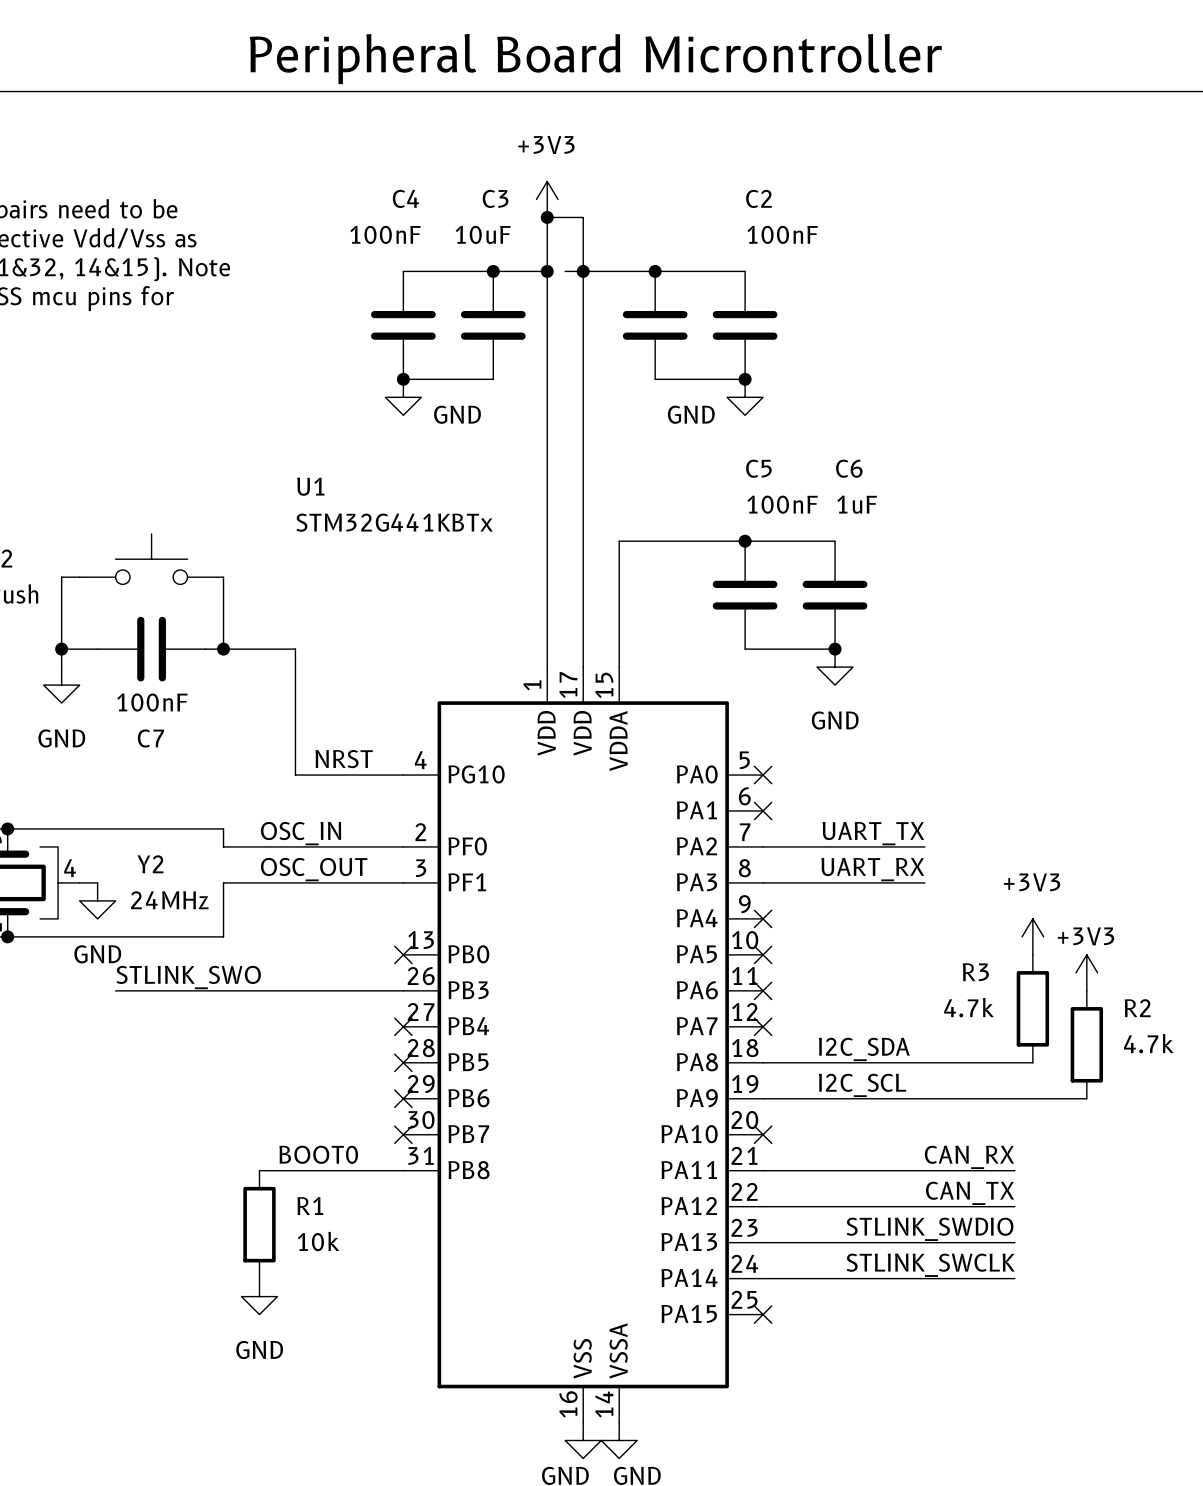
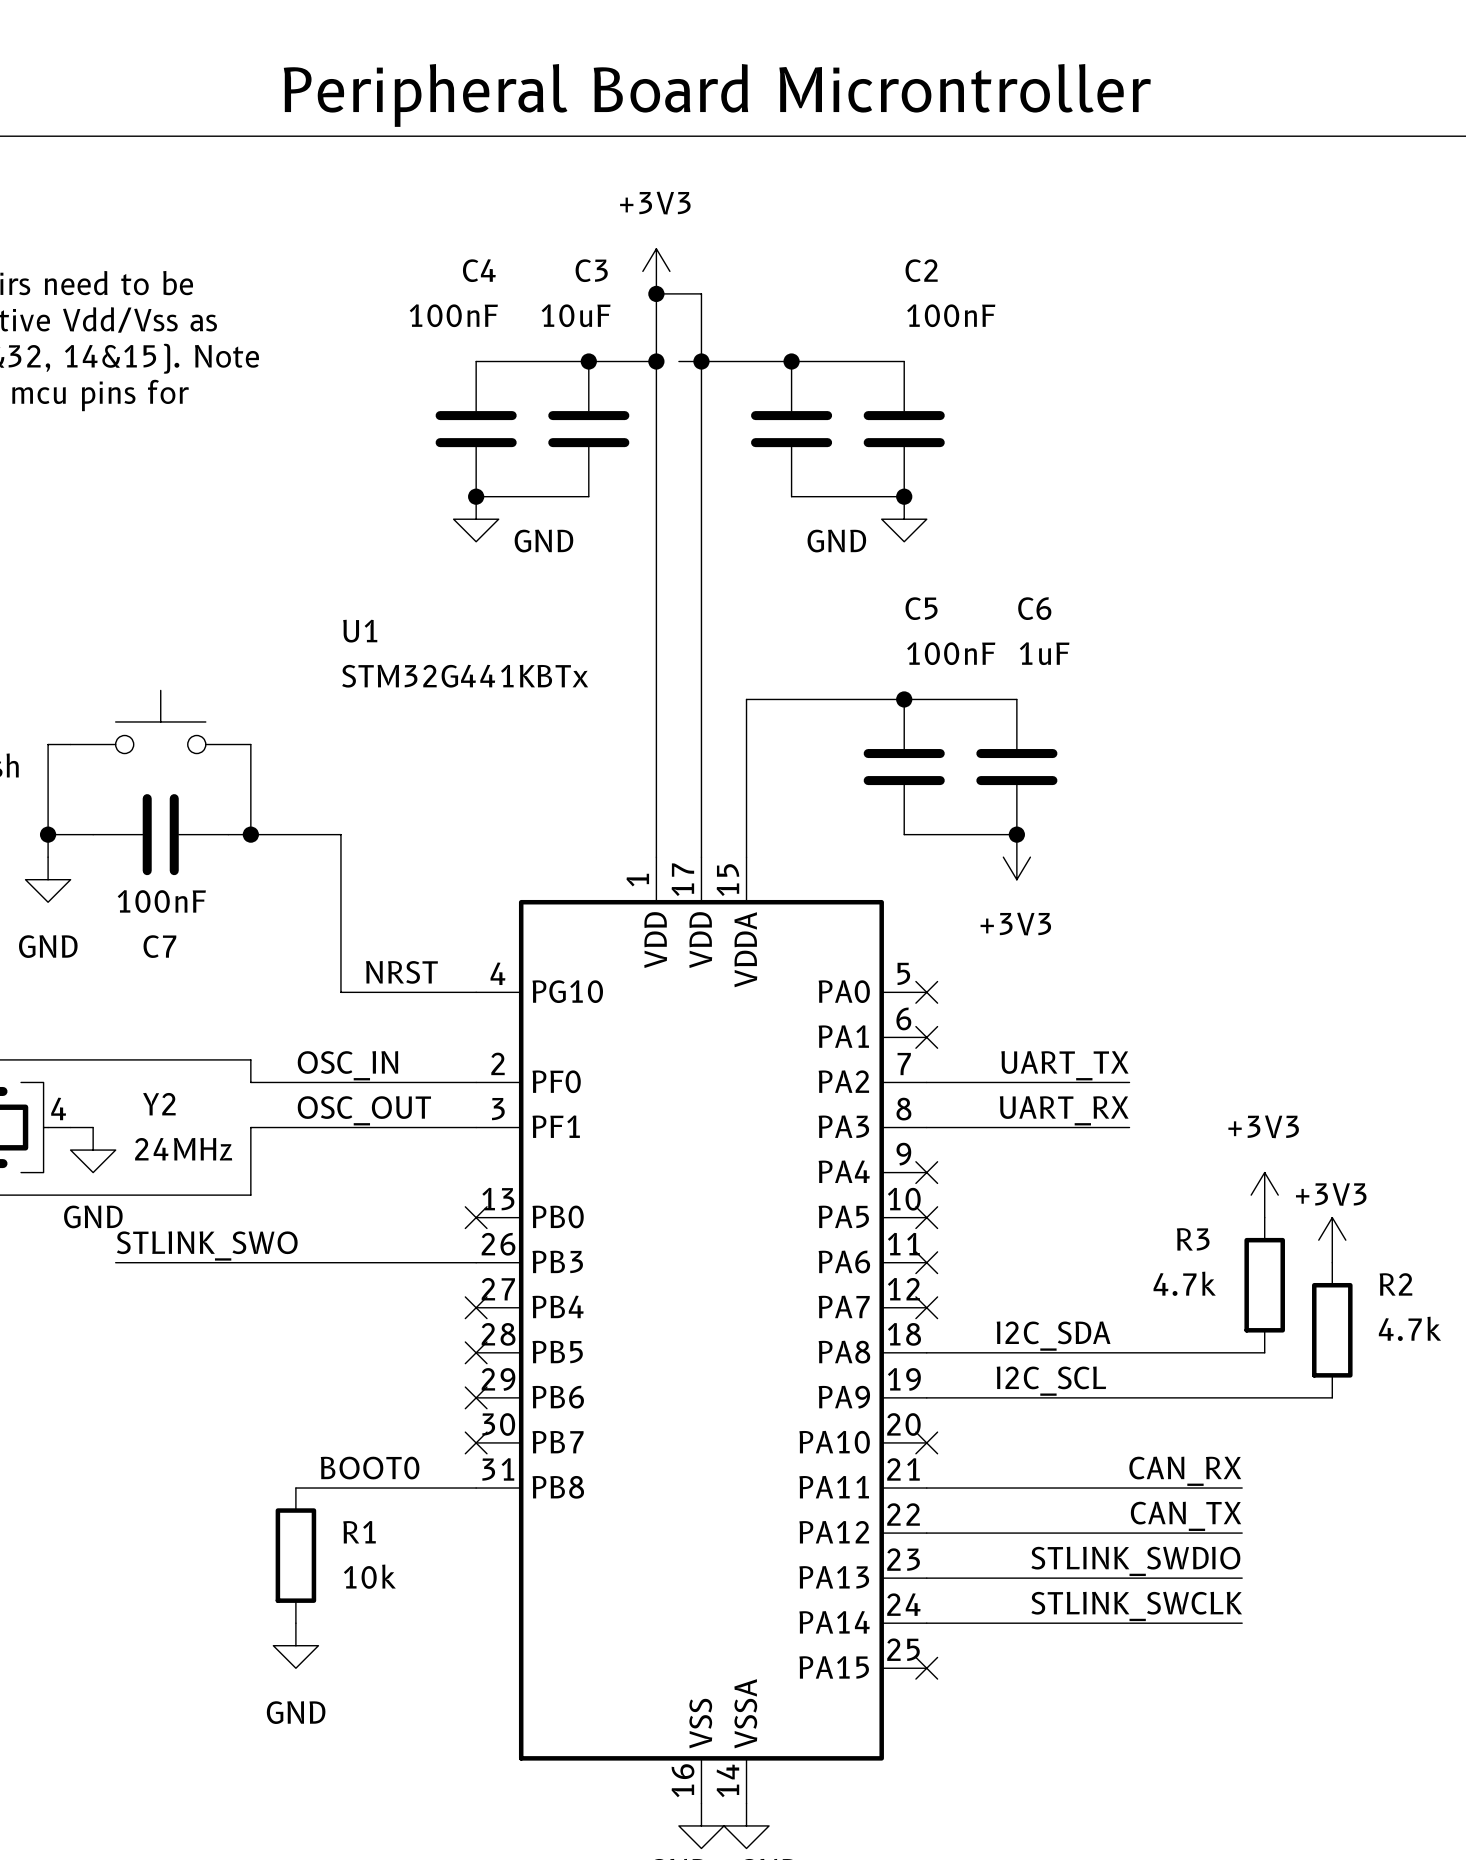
power symbol: GND (835, 667) -> +3V3 (1016, 857)

